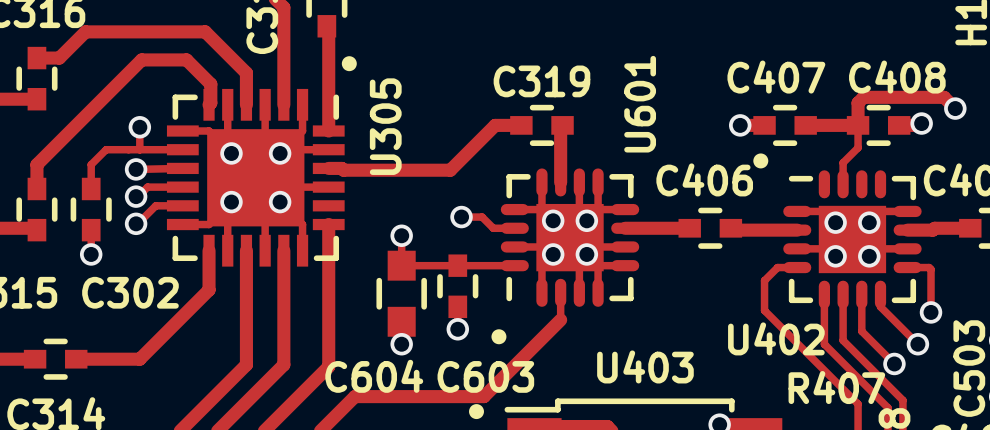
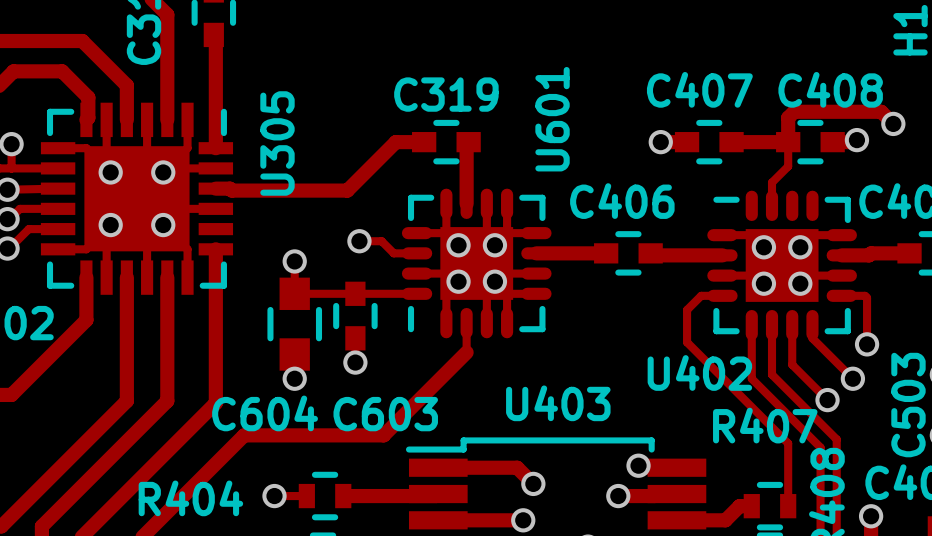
drawing: [341, 56, 357, 72] -> none
drawing: [753, 153, 769, 169] -> none
drawing: [491, 329, 507, 345] -> none
drawing: [469, 404, 484, 420] -> none

